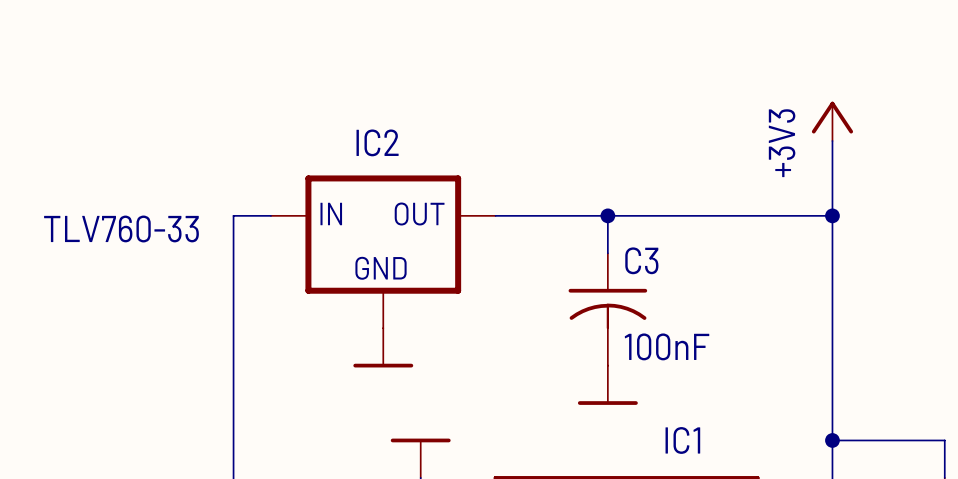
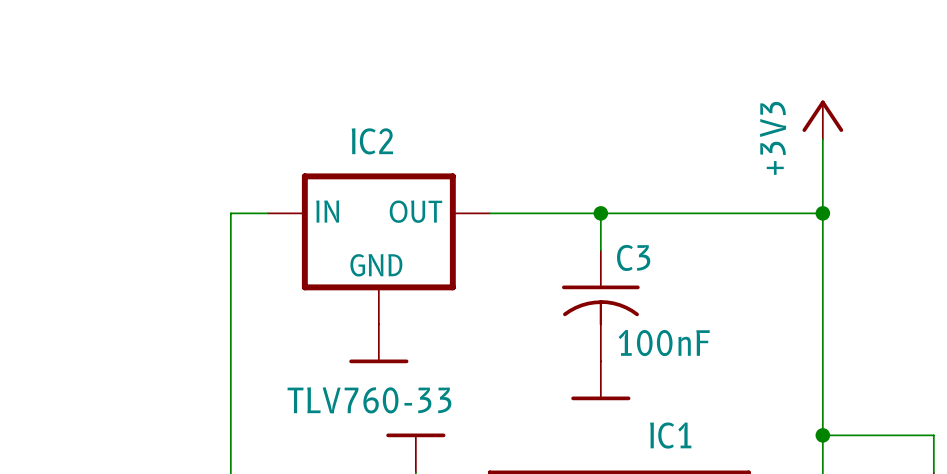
IC2 value position: TLV760-33 (121, 228) -> TLV760-33 (369, 400)

